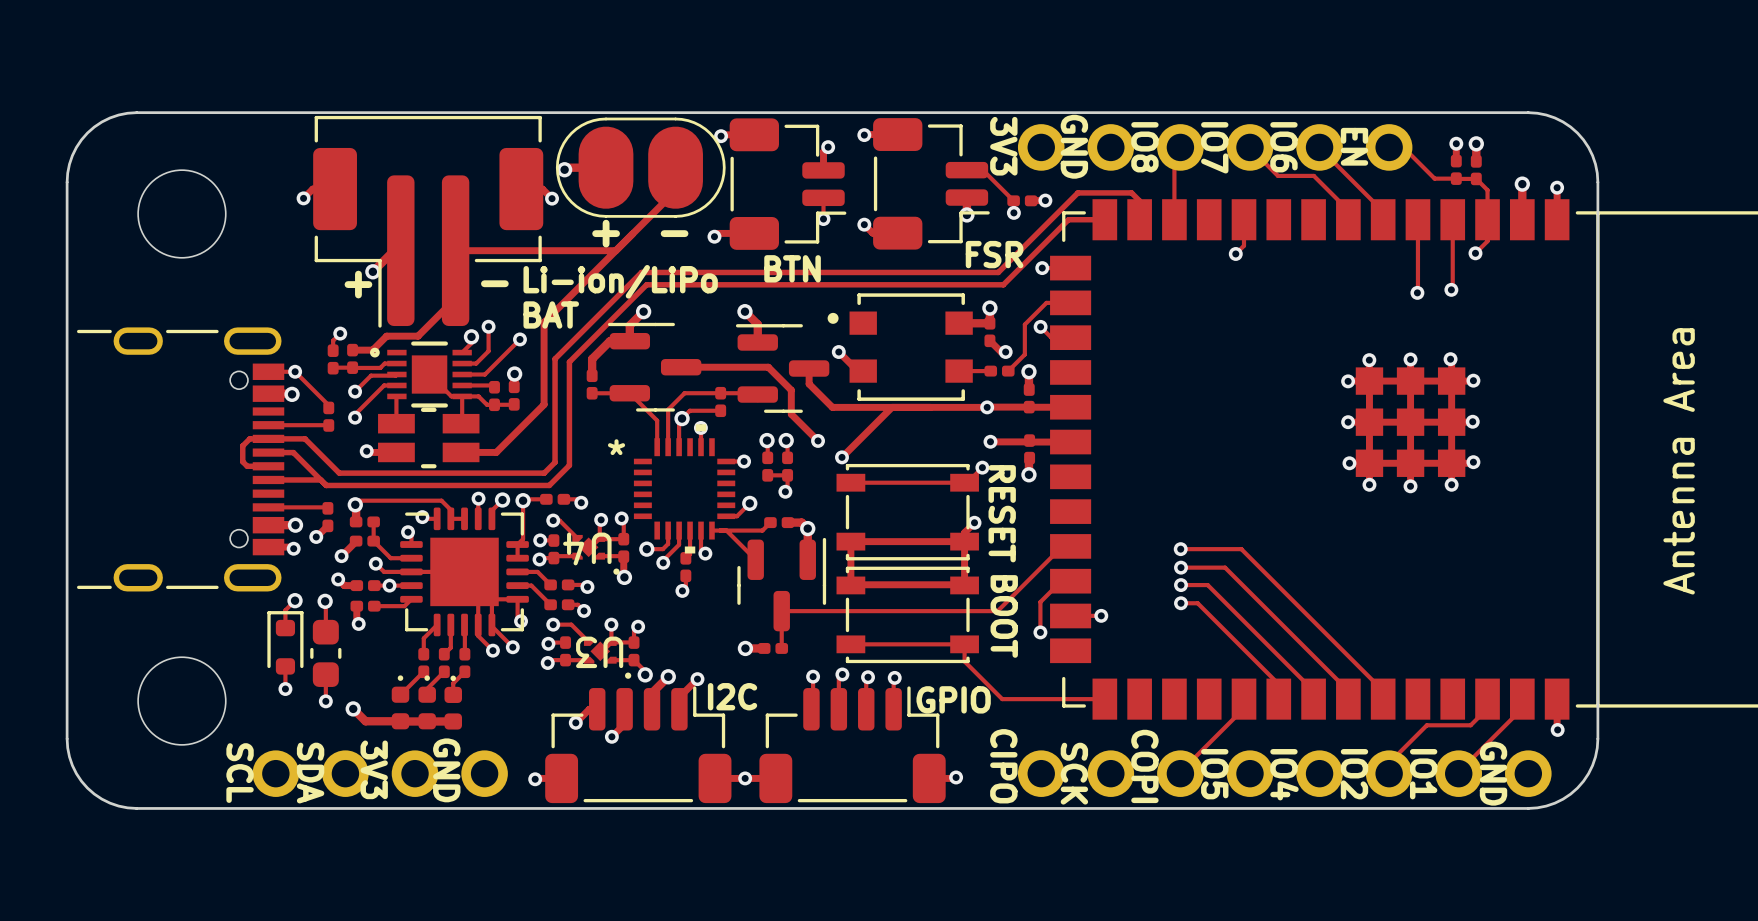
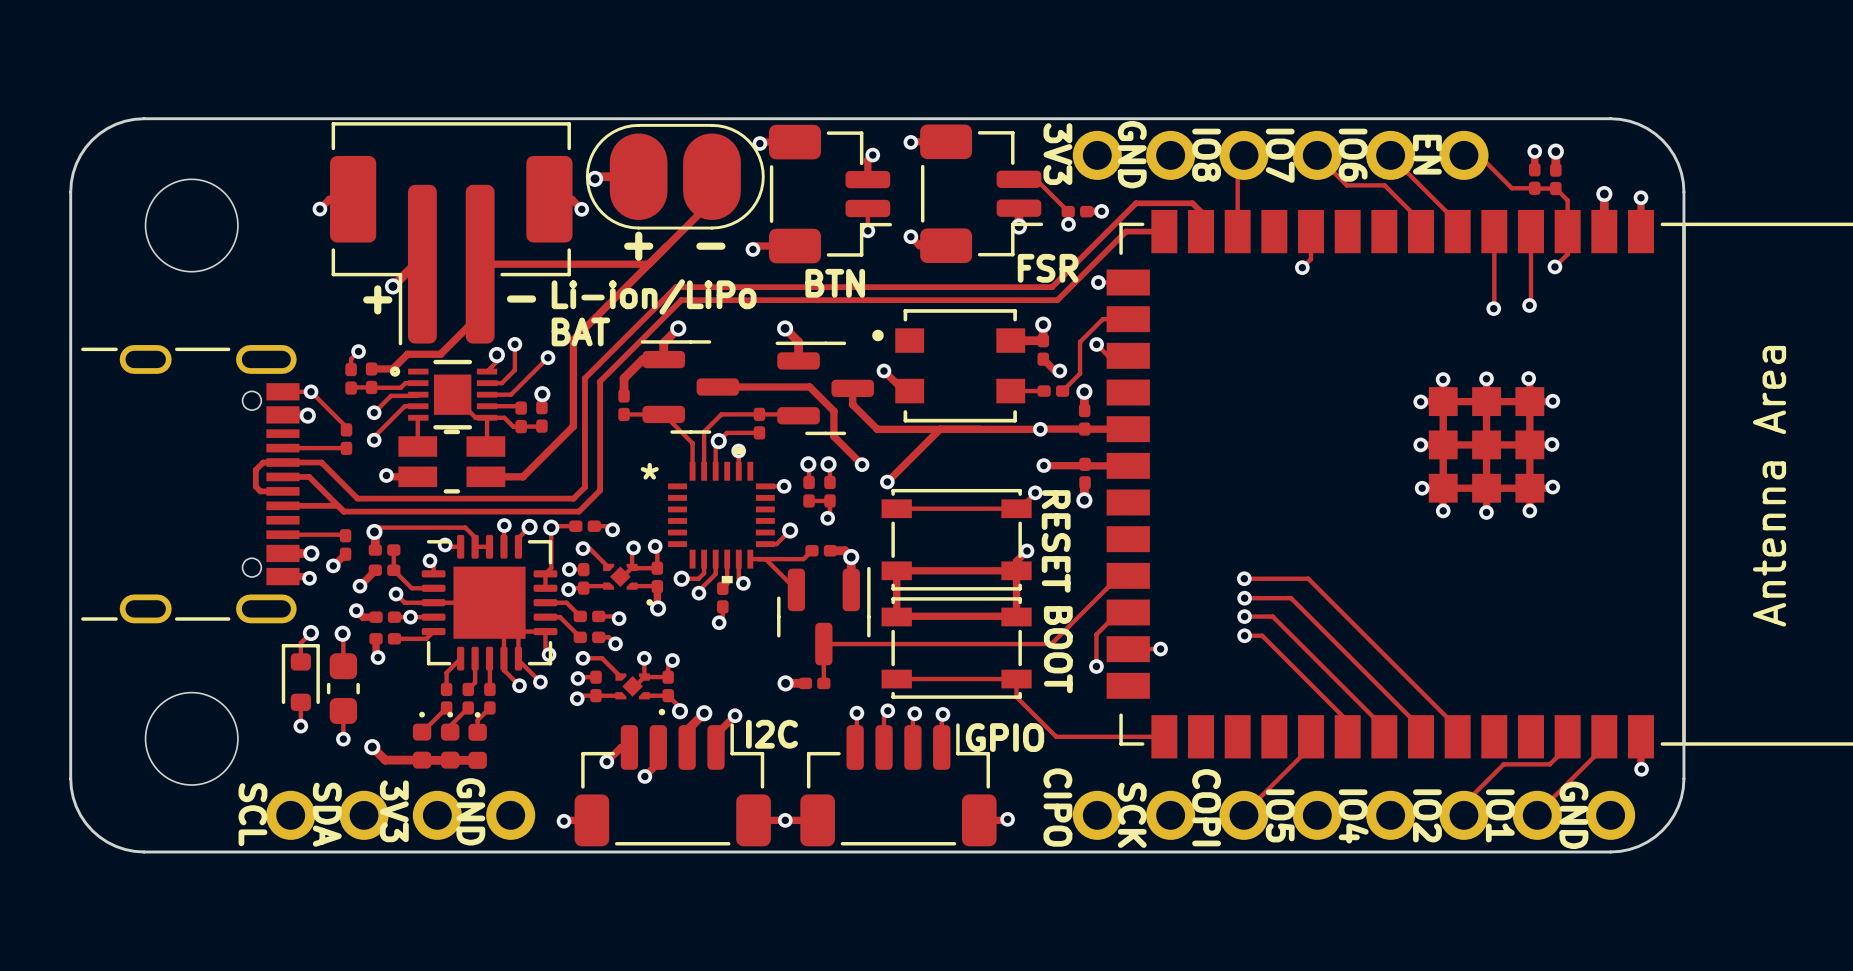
U4 name: U4 (587, 548) -> none
U3 name: U3 (599, 652) -> none

